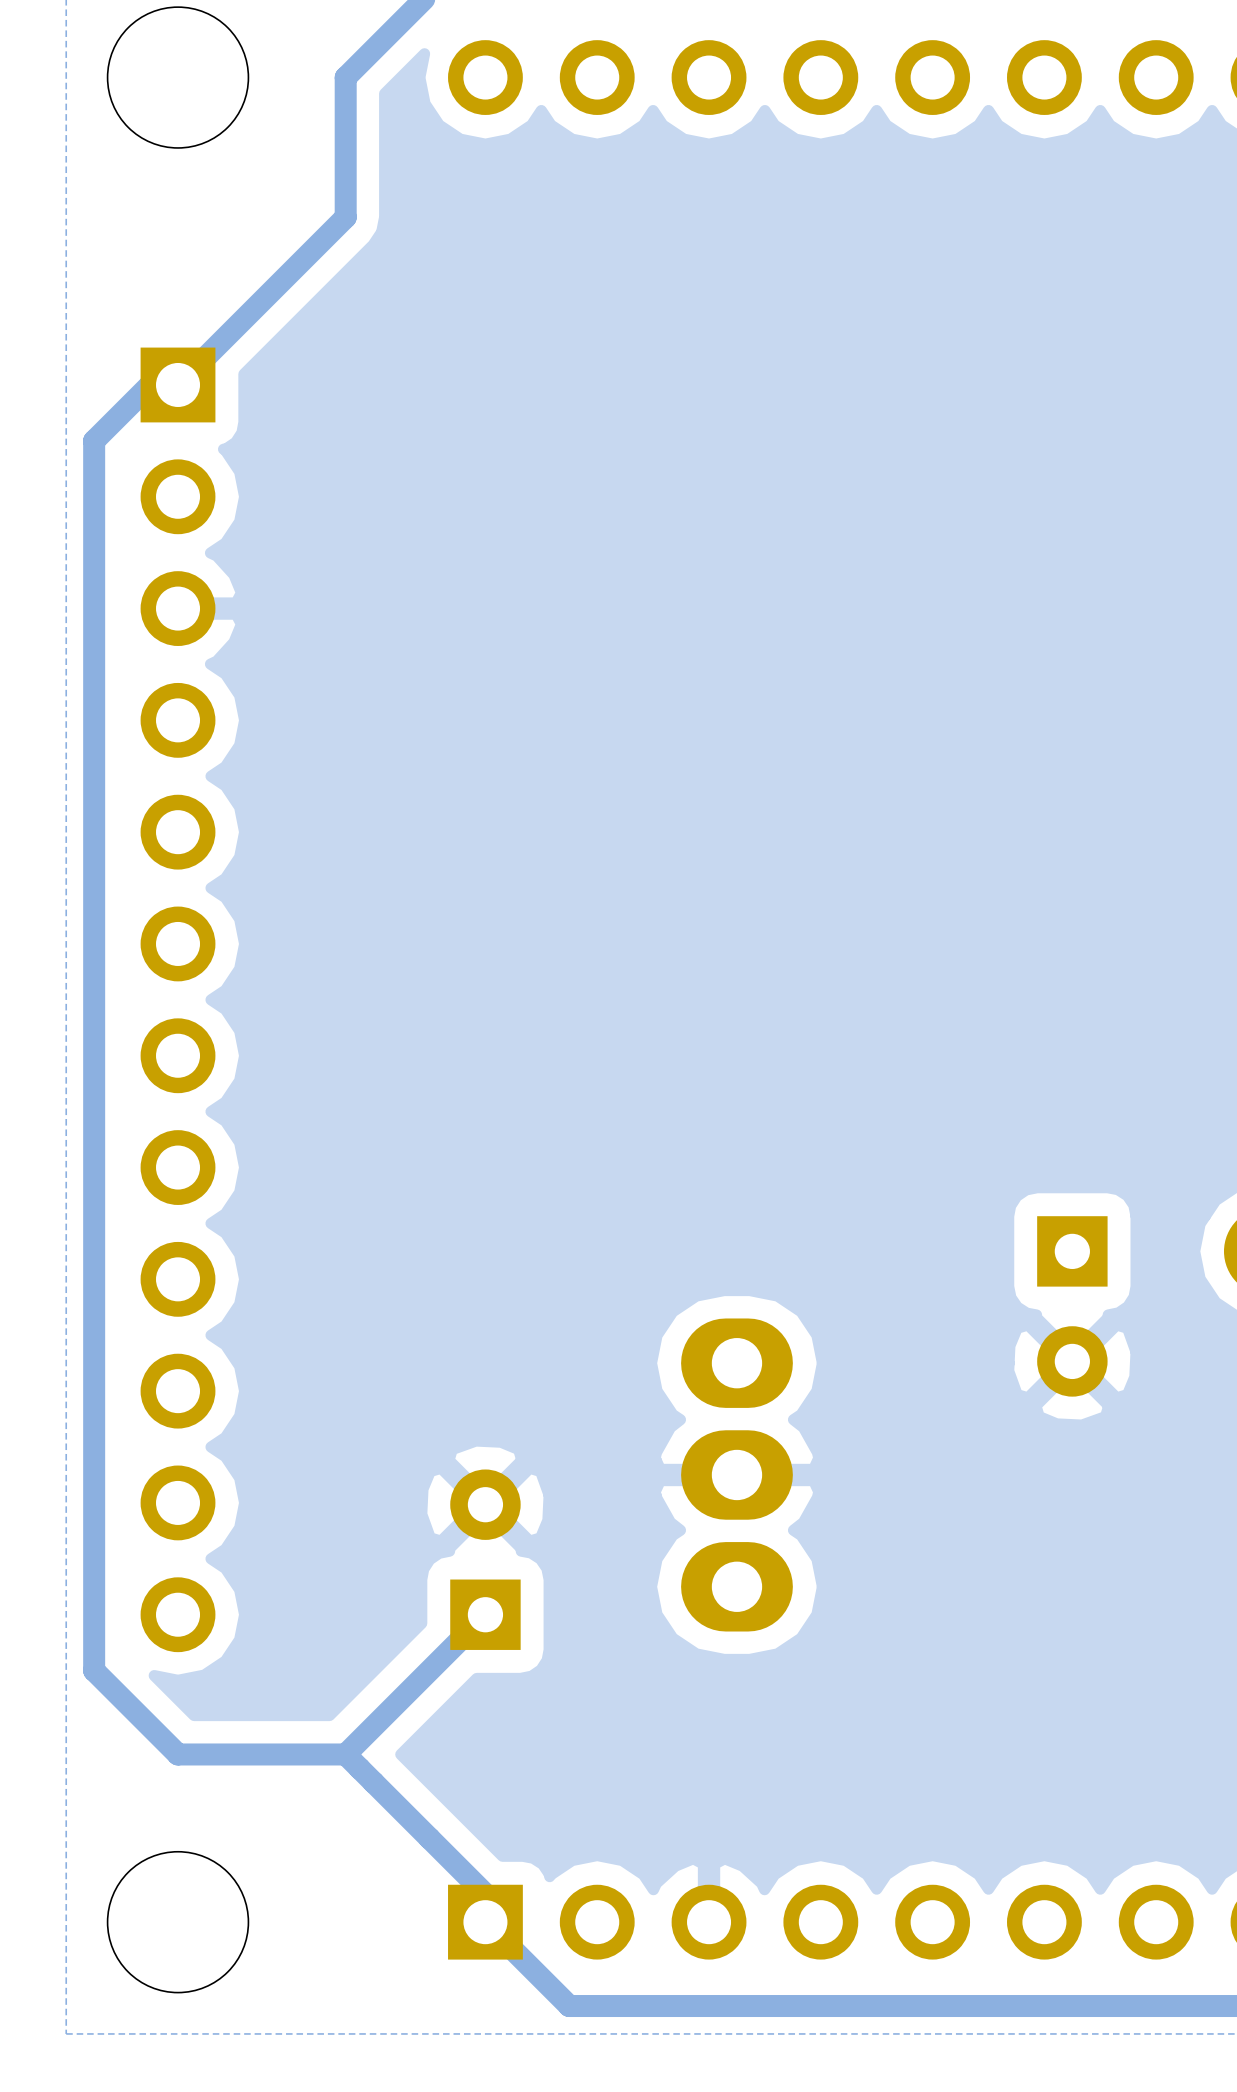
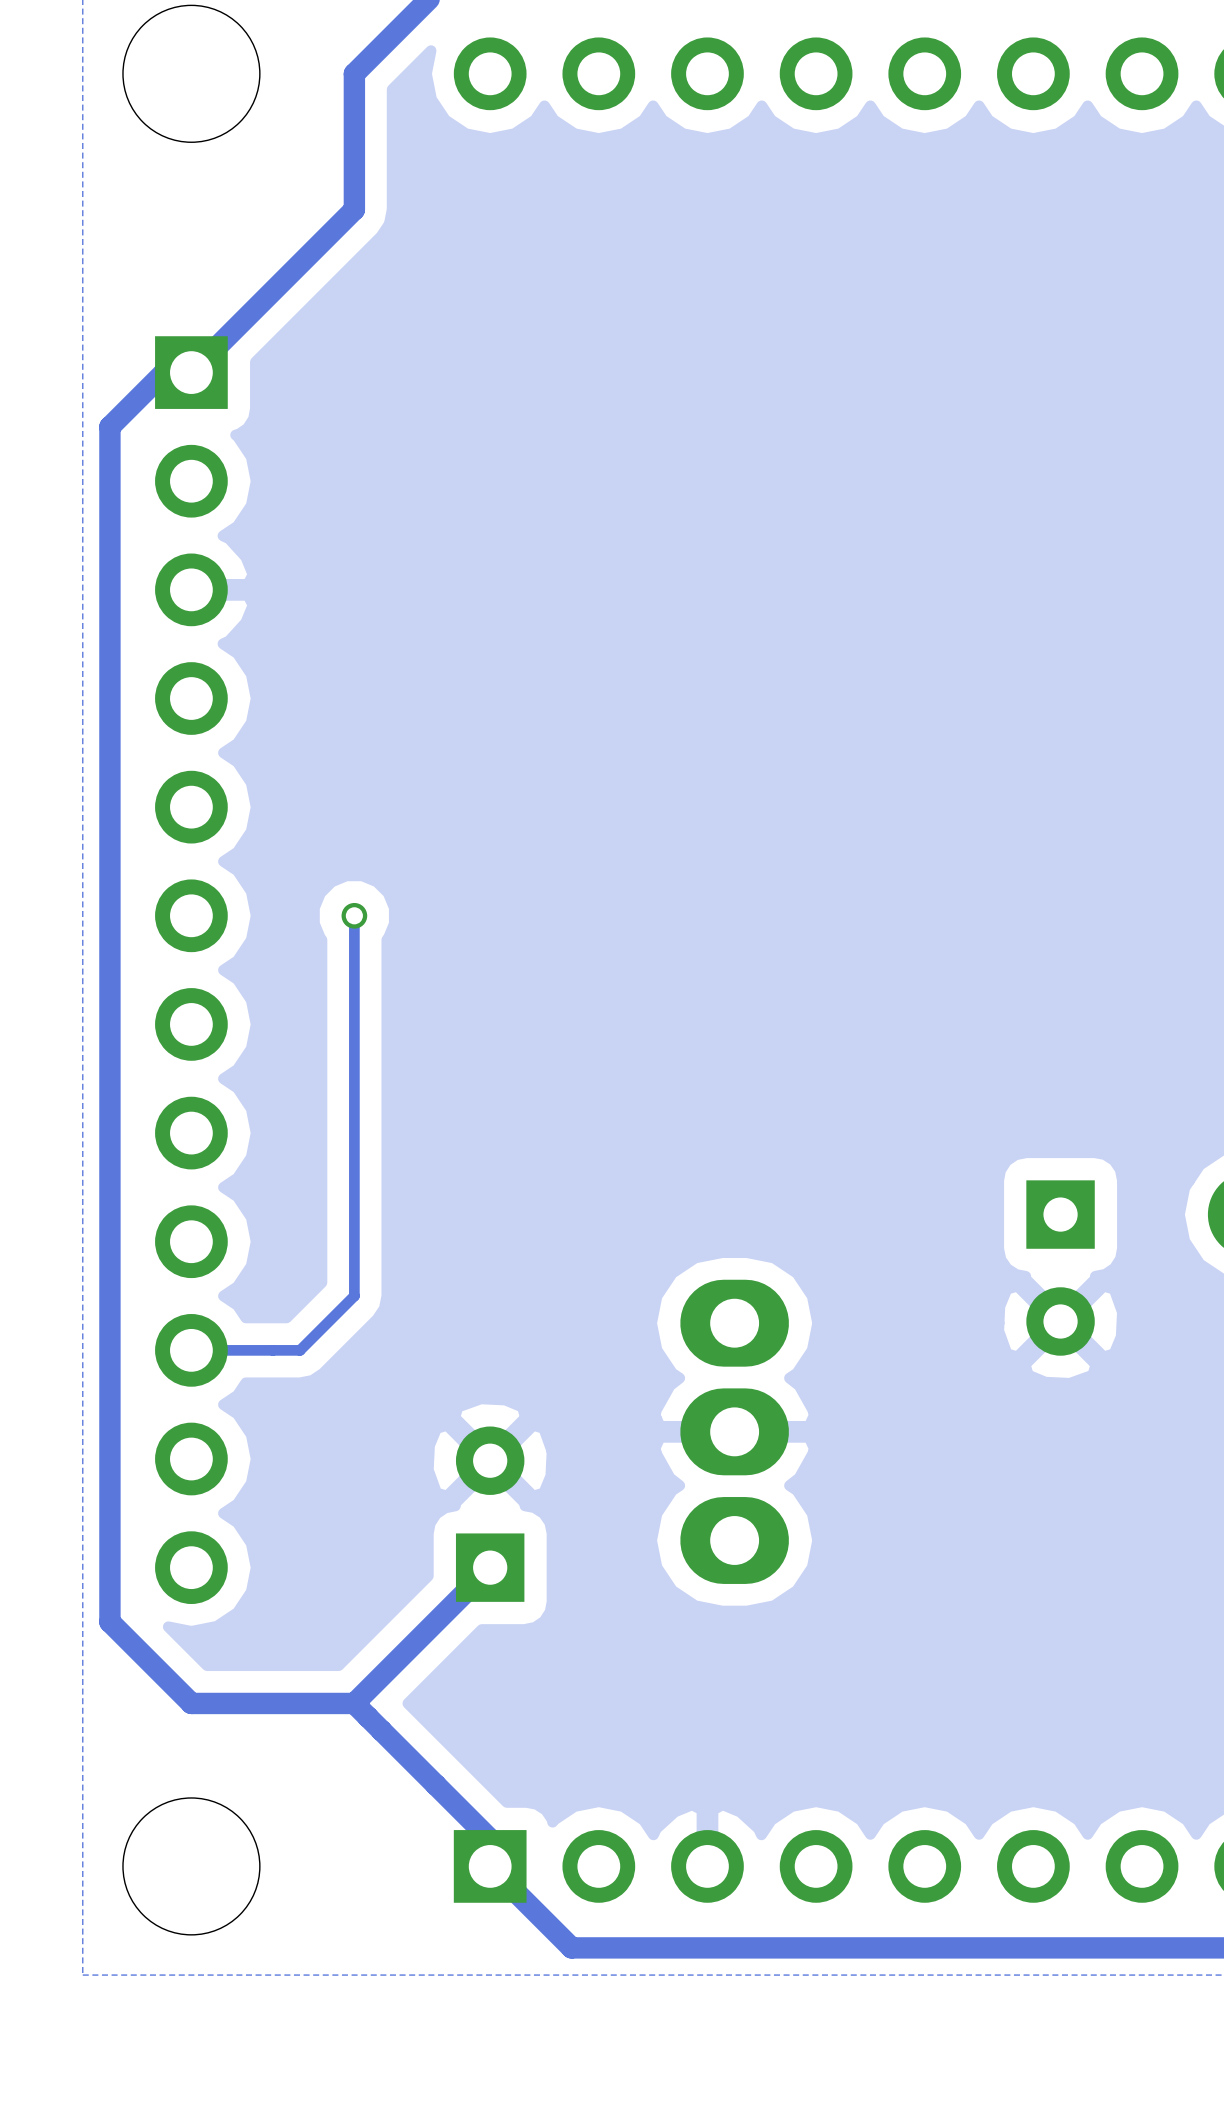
track: none -> (354, 915) (354, 1296) (300, 1350) (191, 1350)
via: none -> (354, 915)

